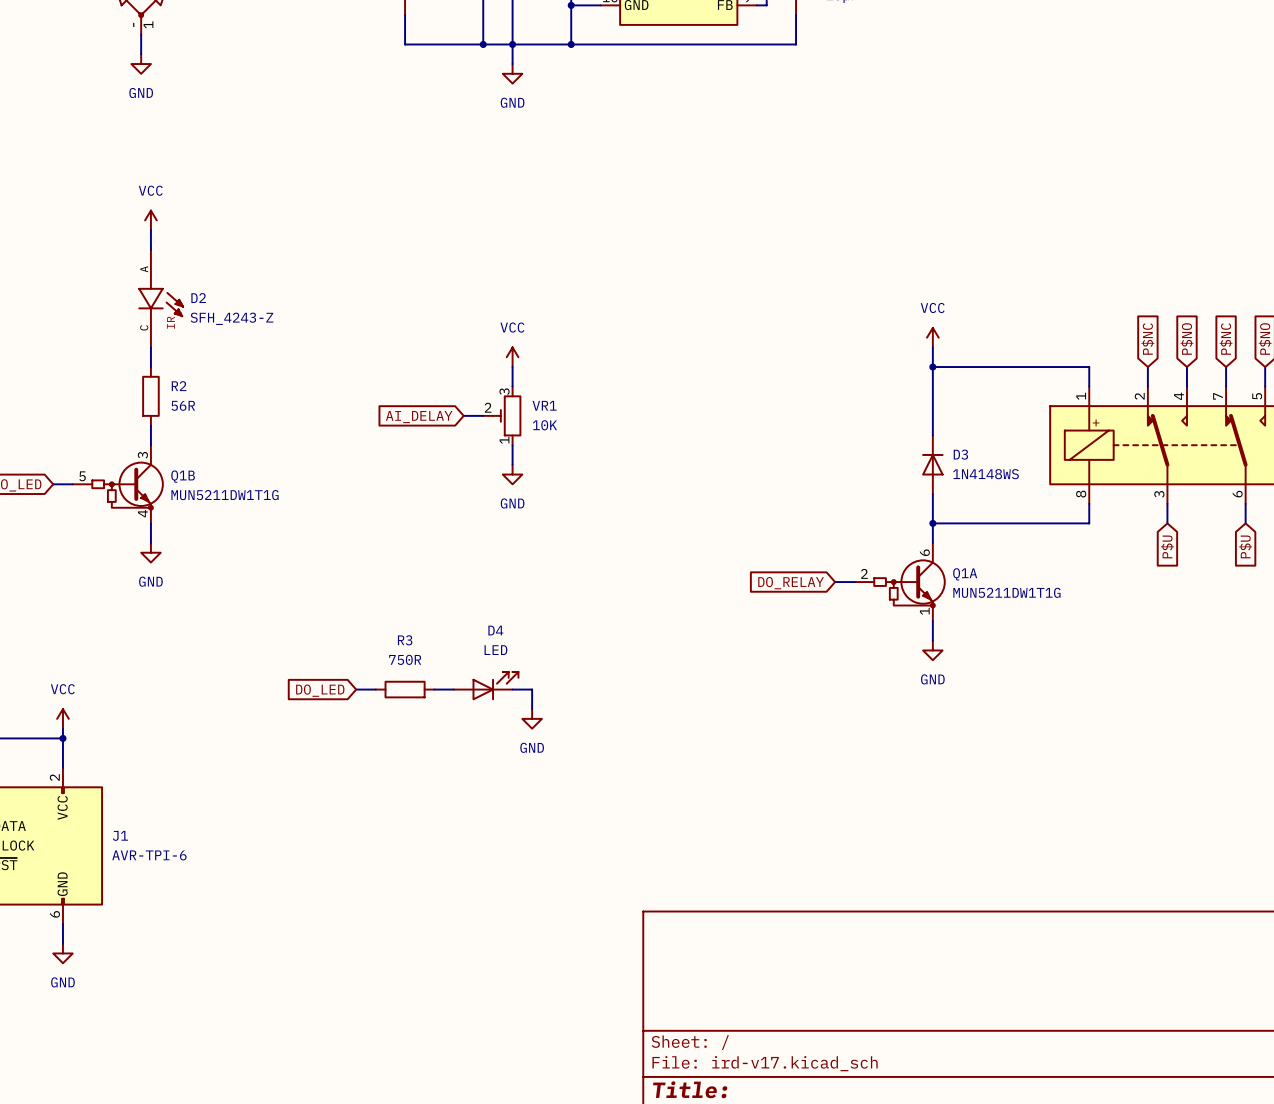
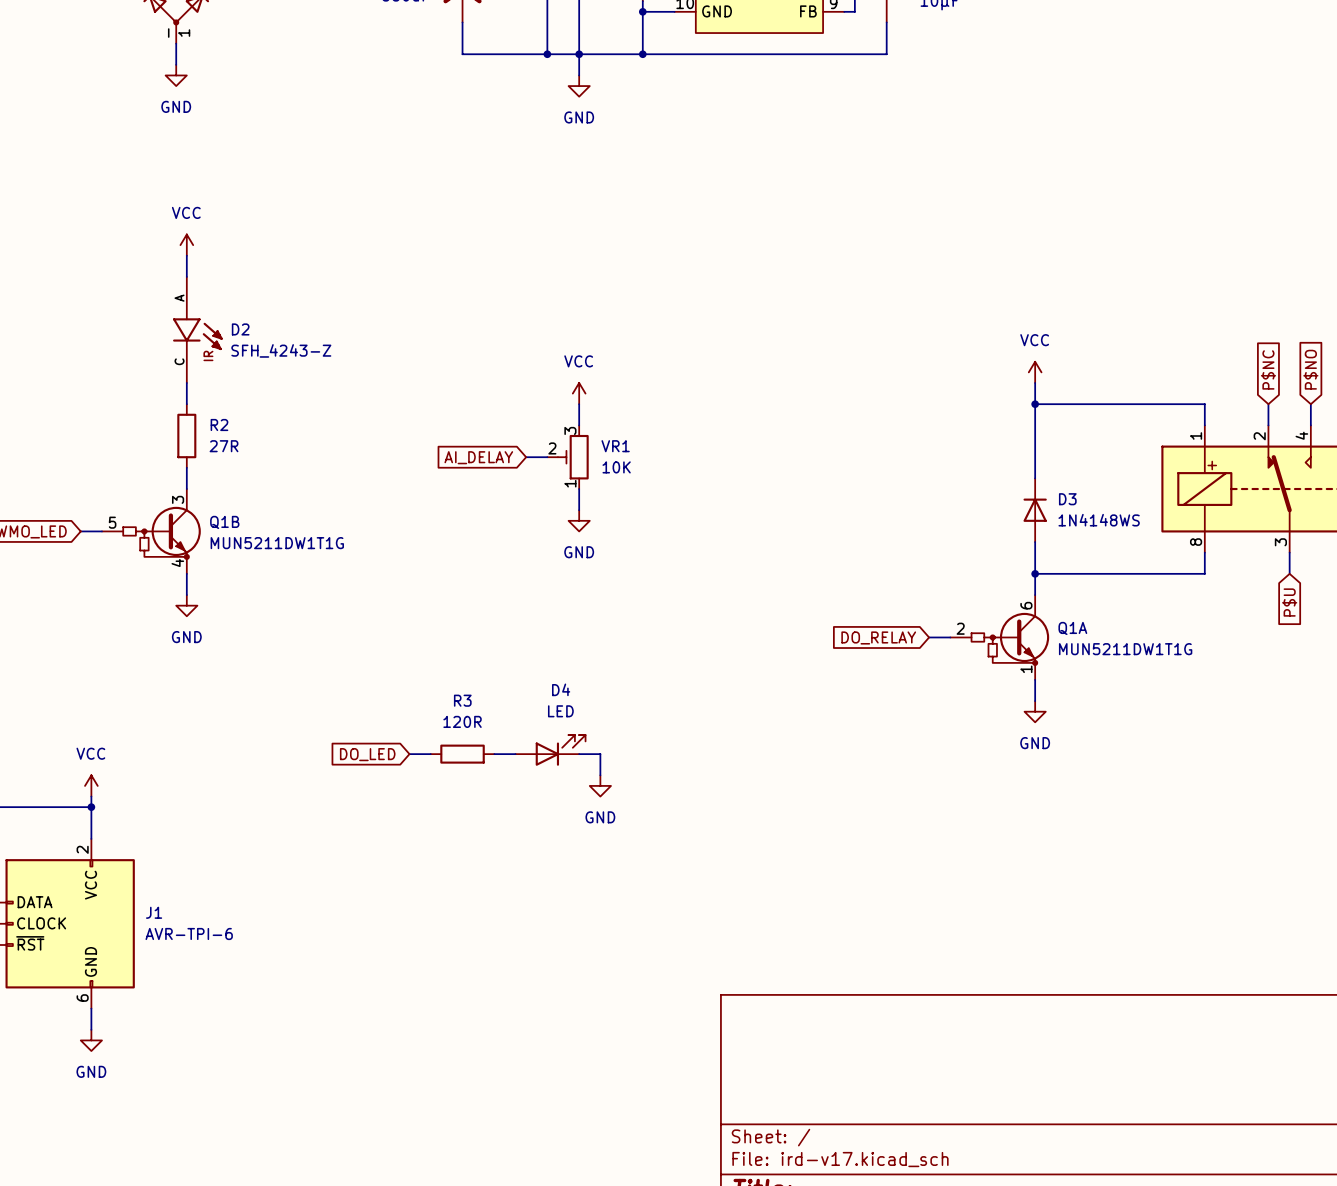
R2 value: 56R (183, 405) -> 27R (224, 446)
R3 value: 750R (405, 659) -> 120R (462, 721)

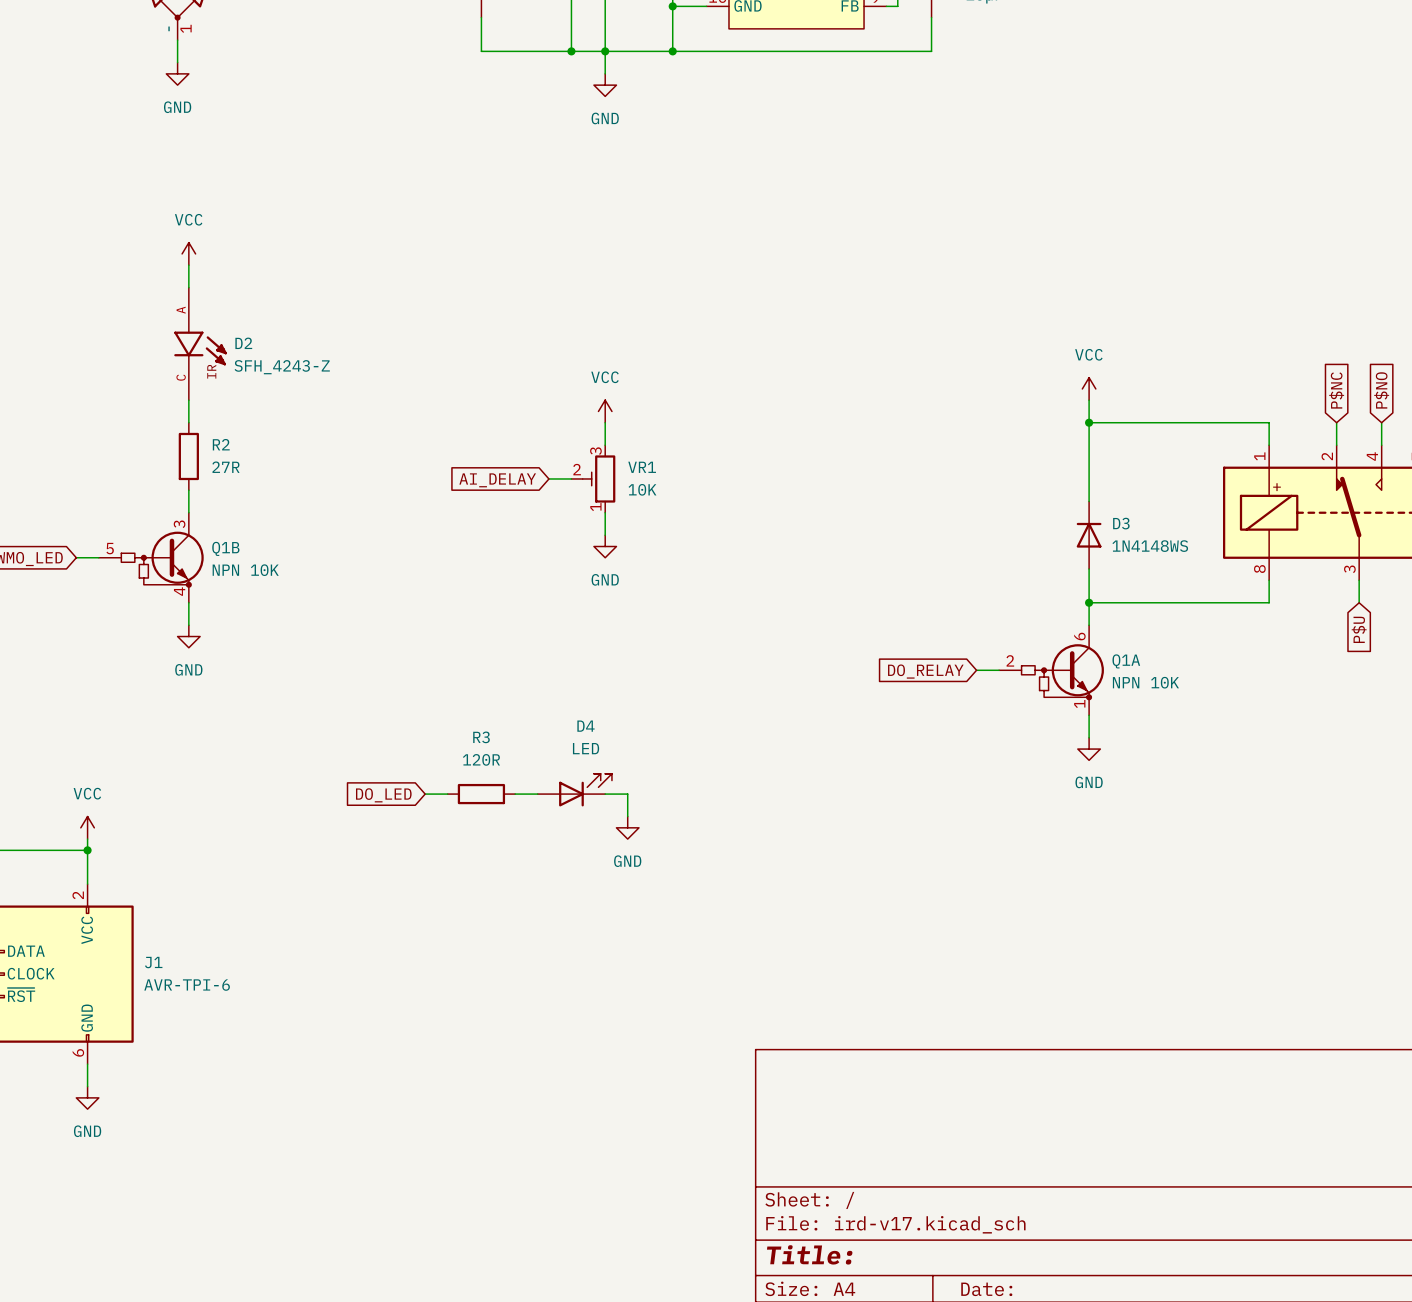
Q1B value: MUN5211DW1T1G (277, 543) -> NPN 10K (245, 570)
Q1A value: MUN5211DW1T1G (1125, 649) -> NPN 10K (1145, 682)

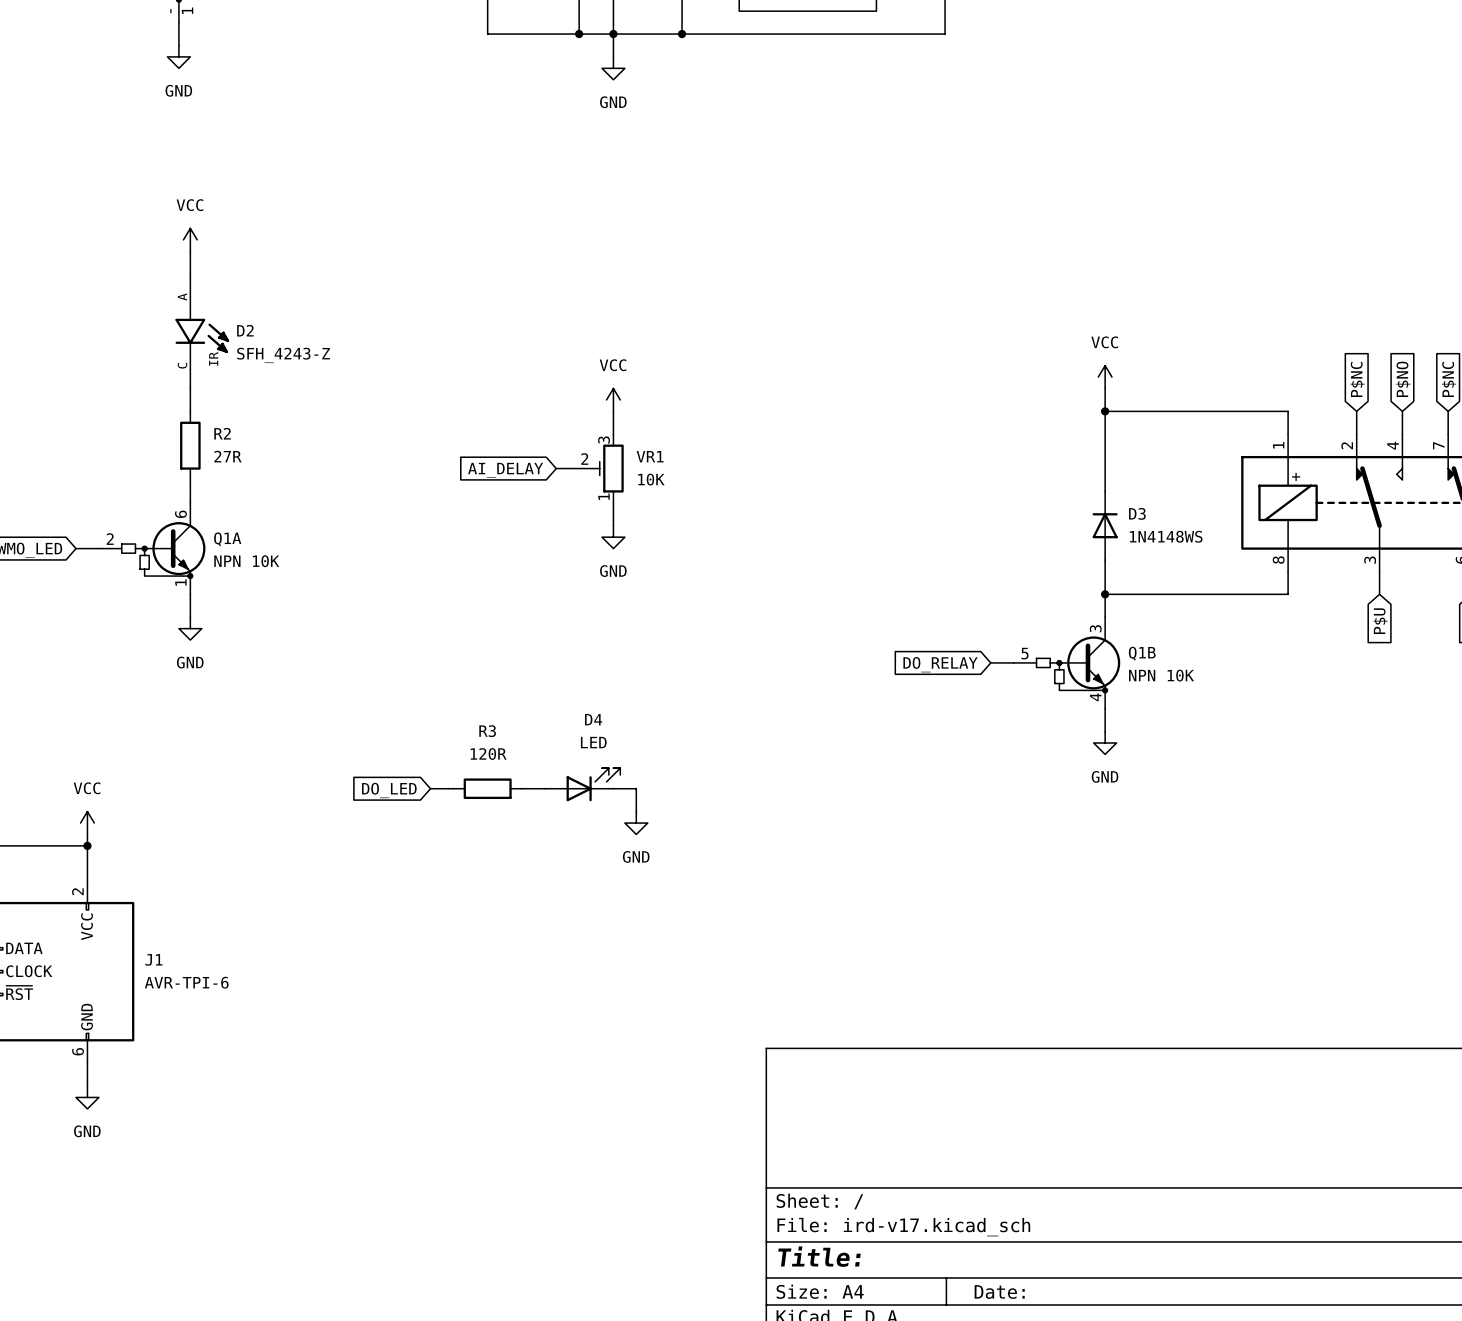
Q1B position: (151, 557) -> (1066, 662)
Q1A position: (1051, 670) -> (152, 548)

